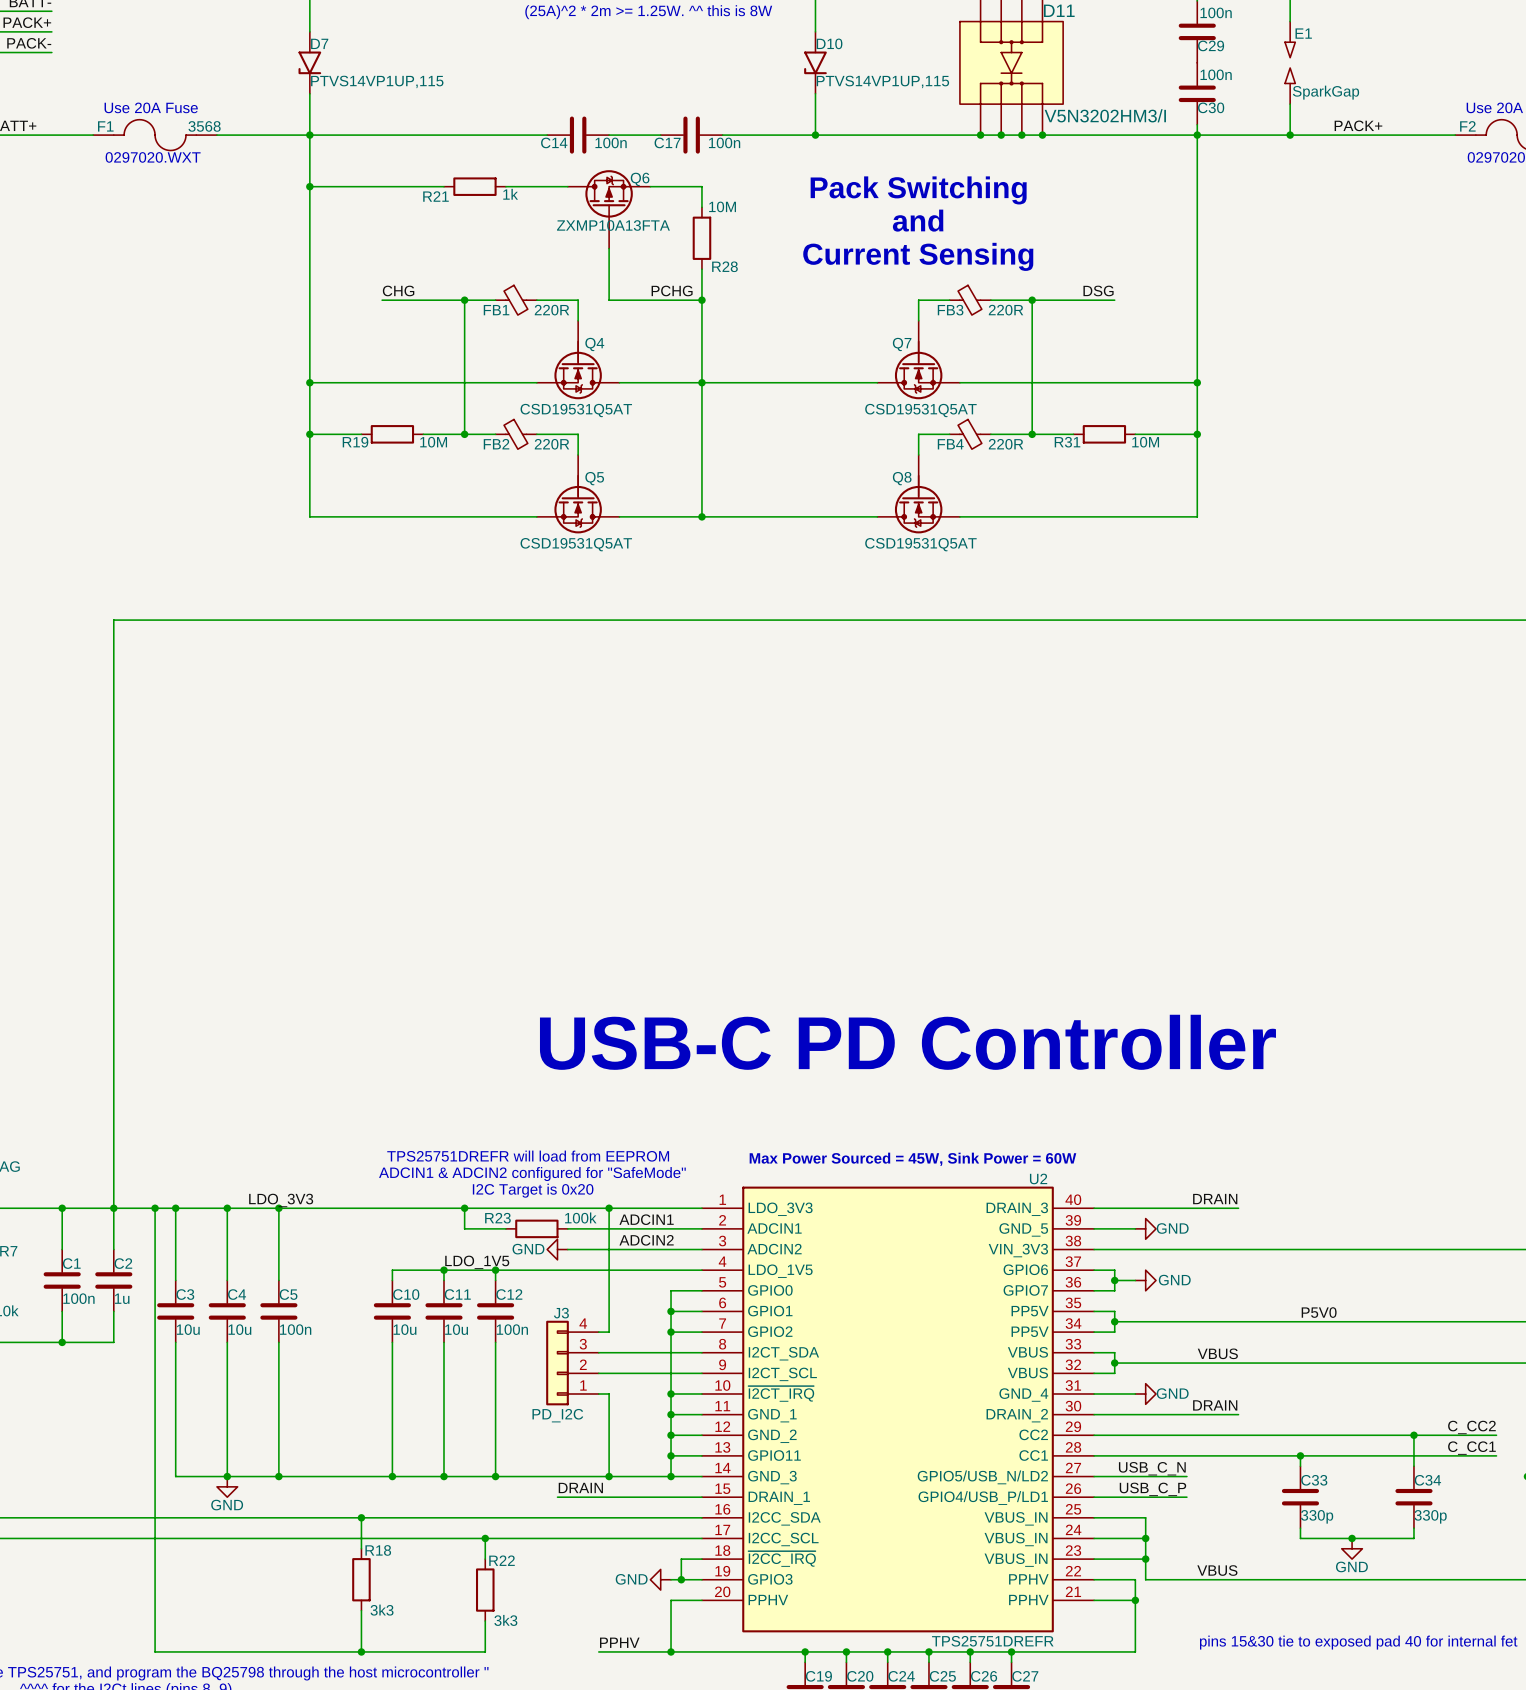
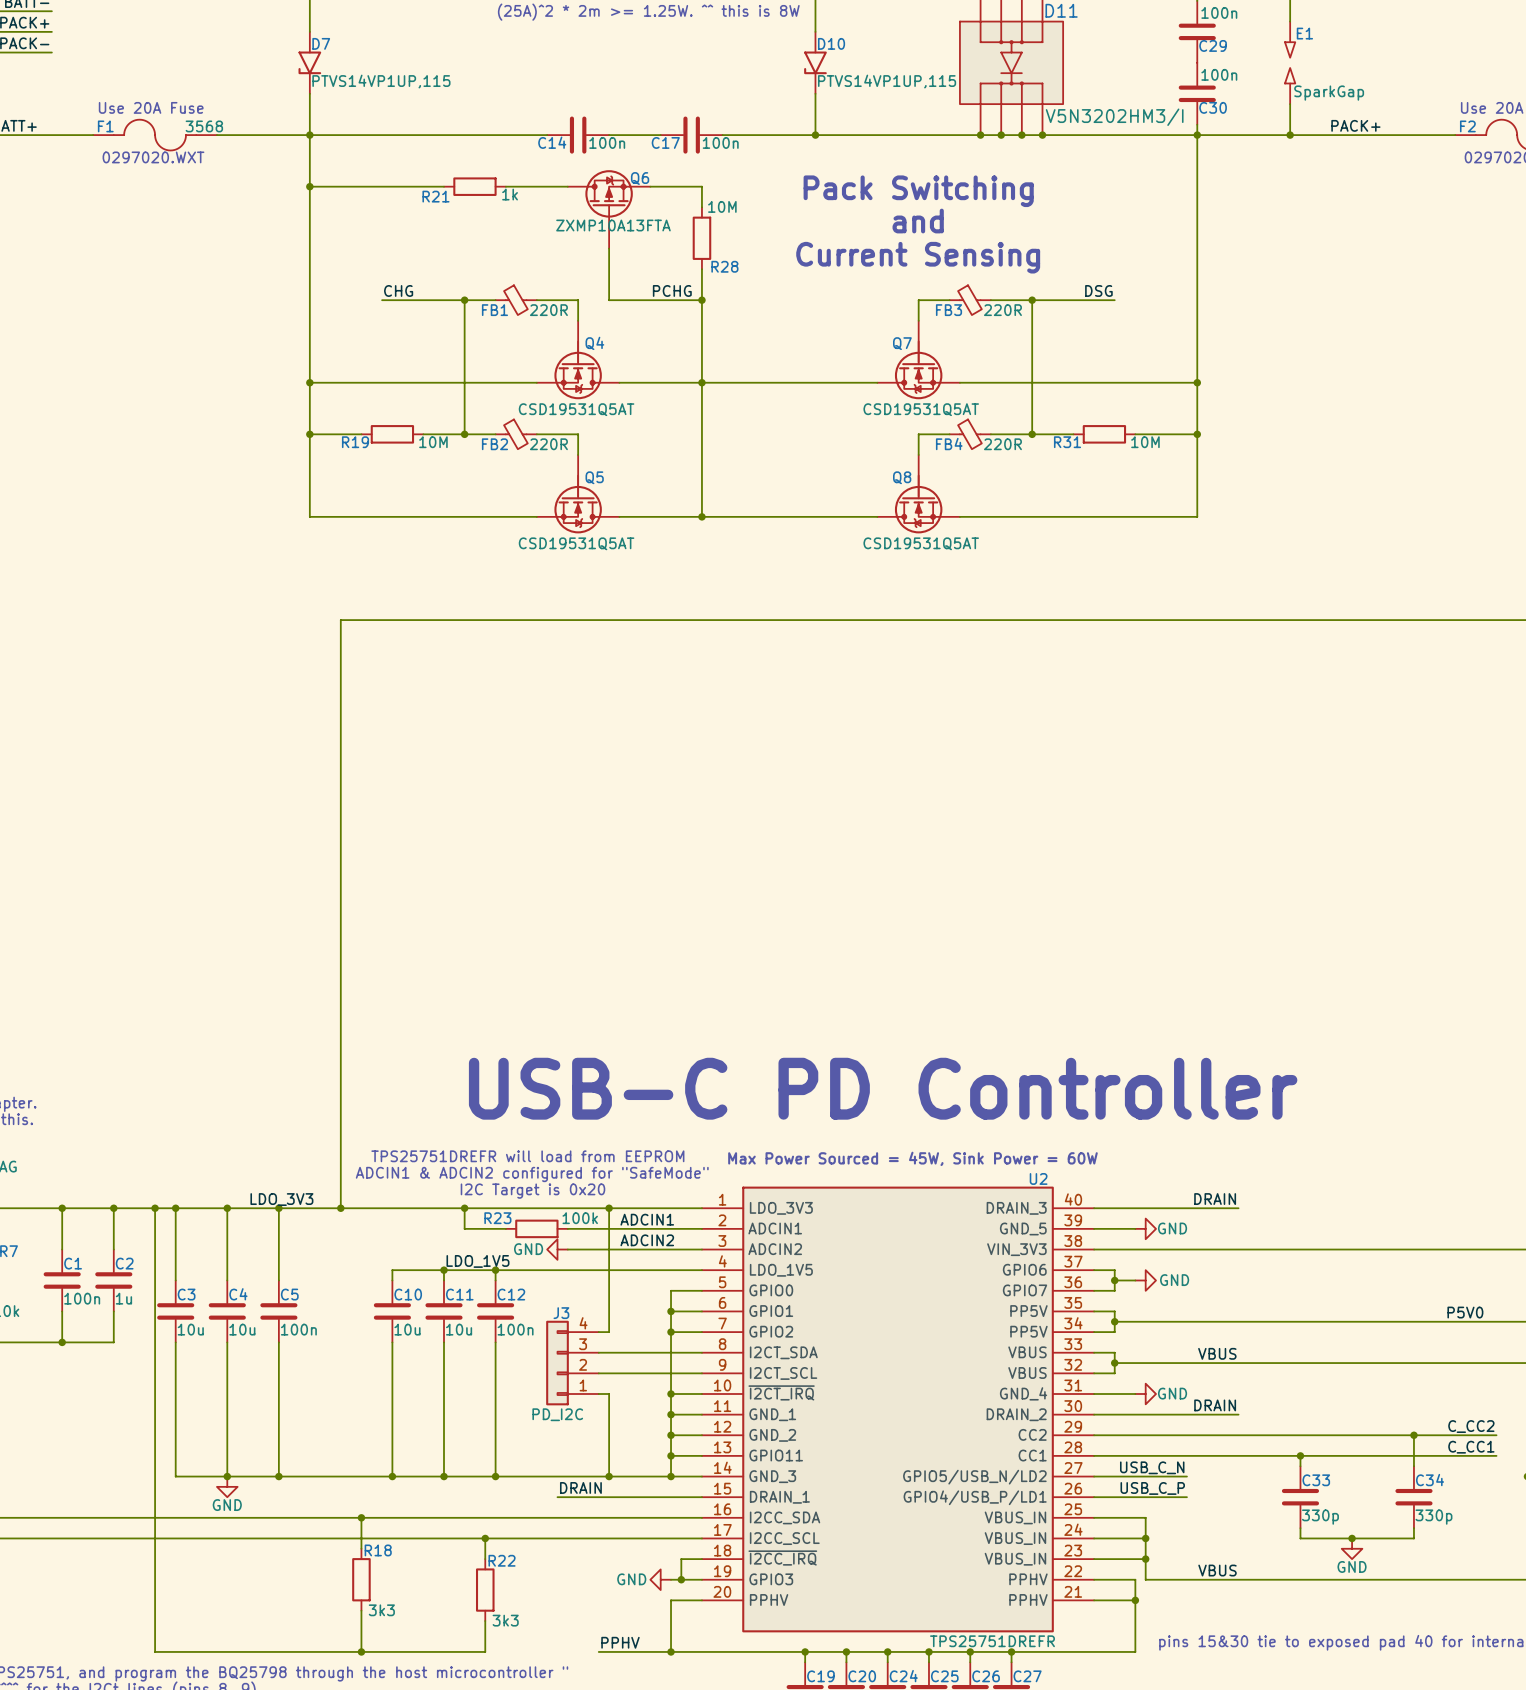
wire: (340, 620) (113, 620) (113, 1208) -> (340, 620) (340, 1208)
text position: USB-C PD Controller (907, 1042) -> USB-C PD Controller (883, 1088)
junction: none -> (340, 1208)
label position: P5V0 (1319, 1312) -> P5V0 (1465, 1312)

